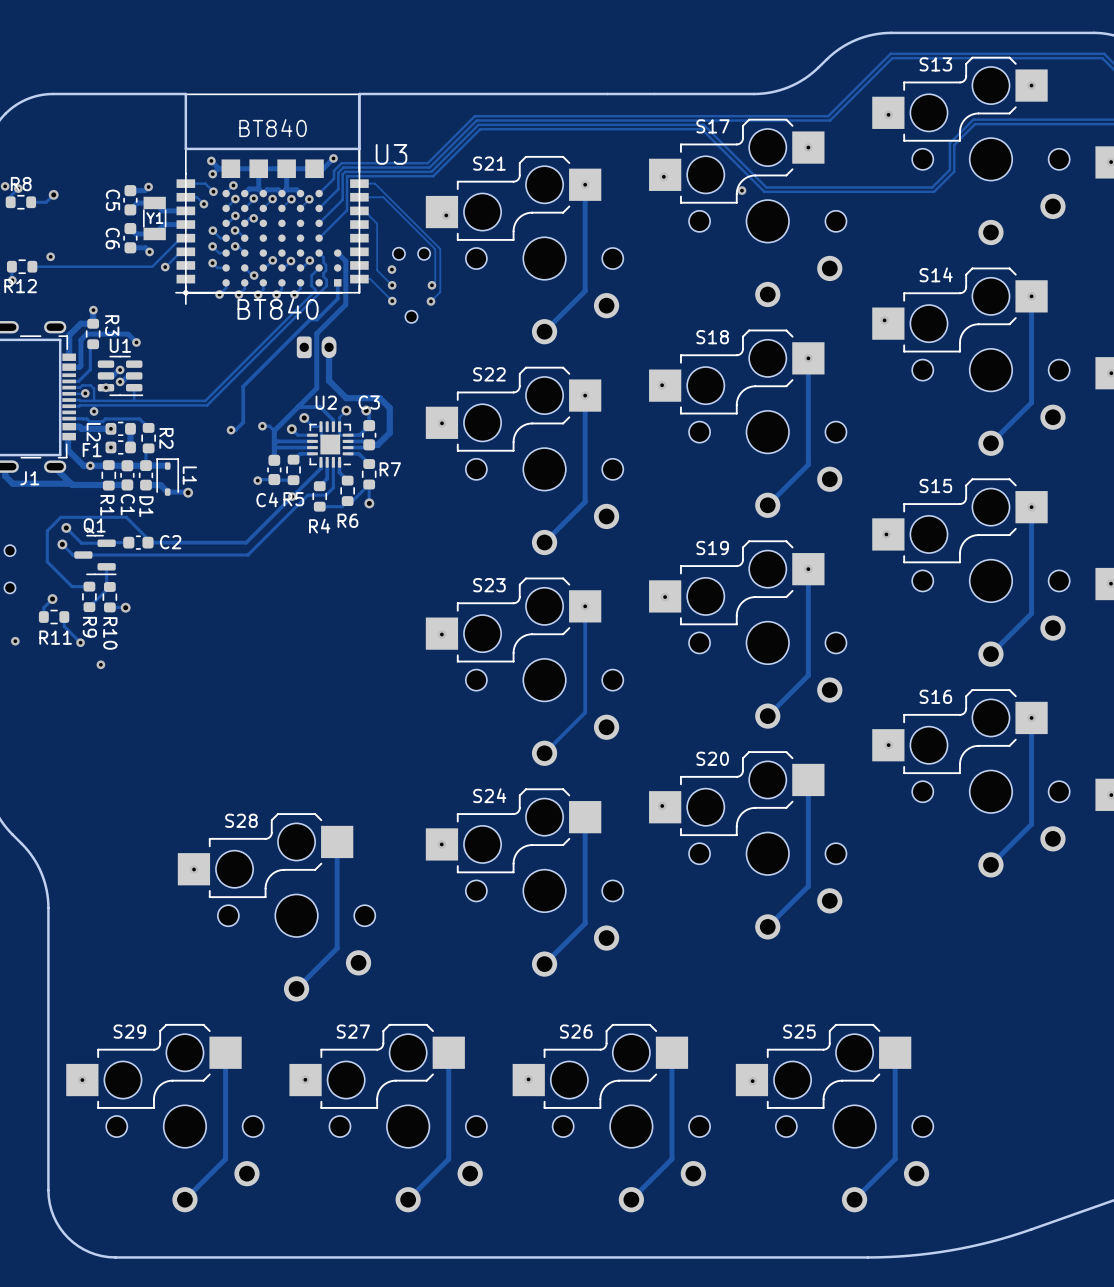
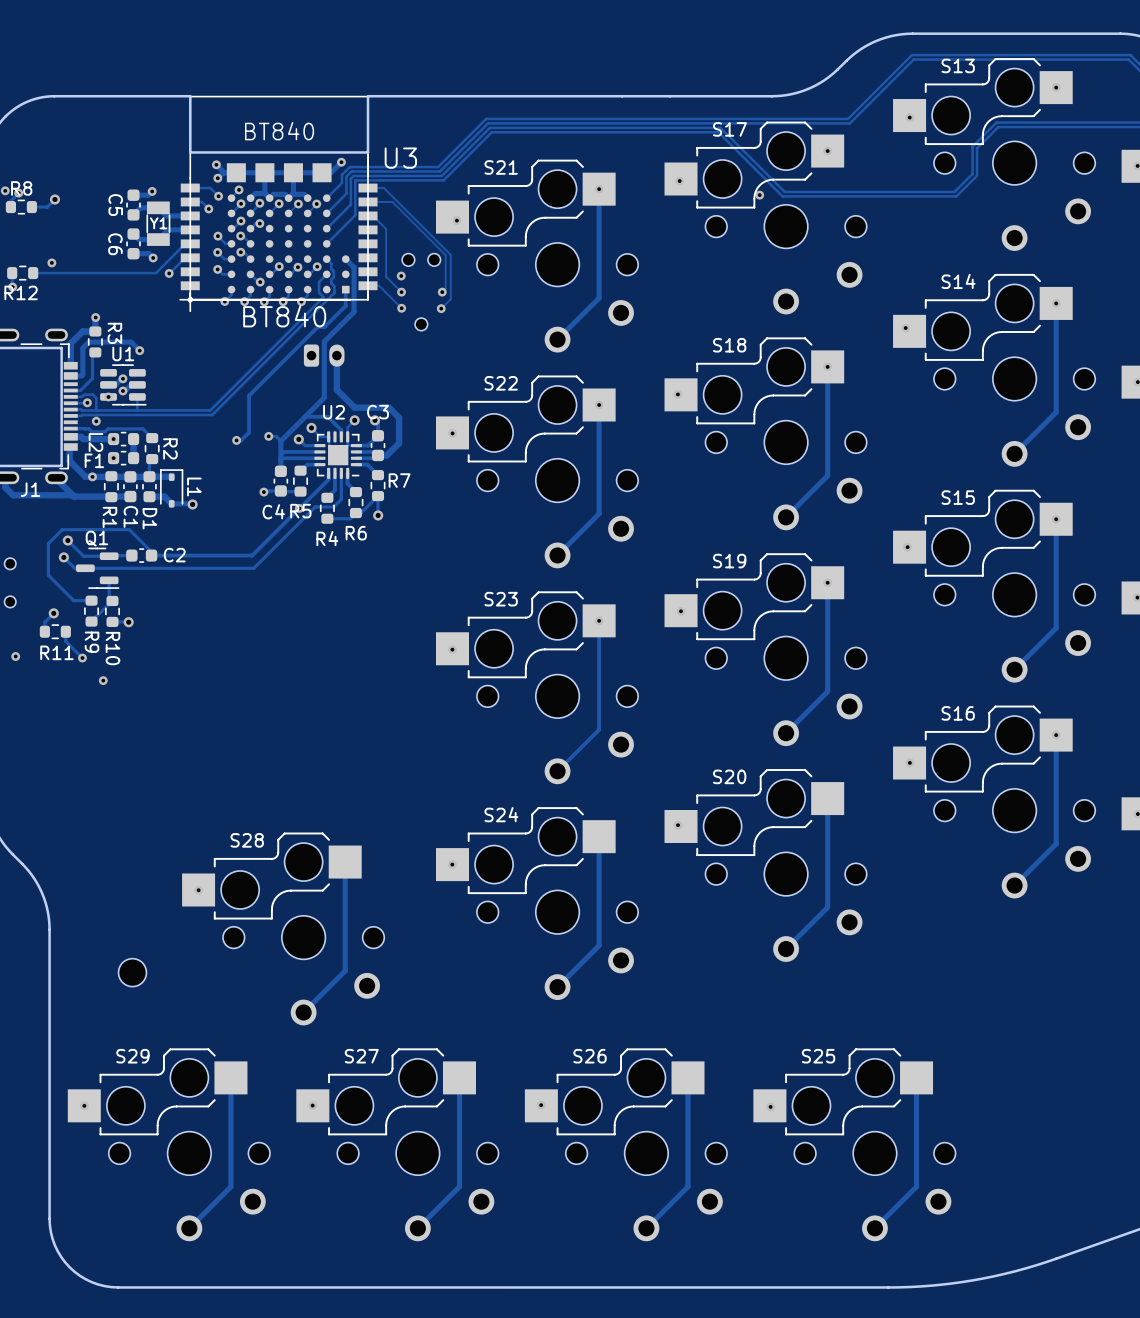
part: none -> (132, 972)

